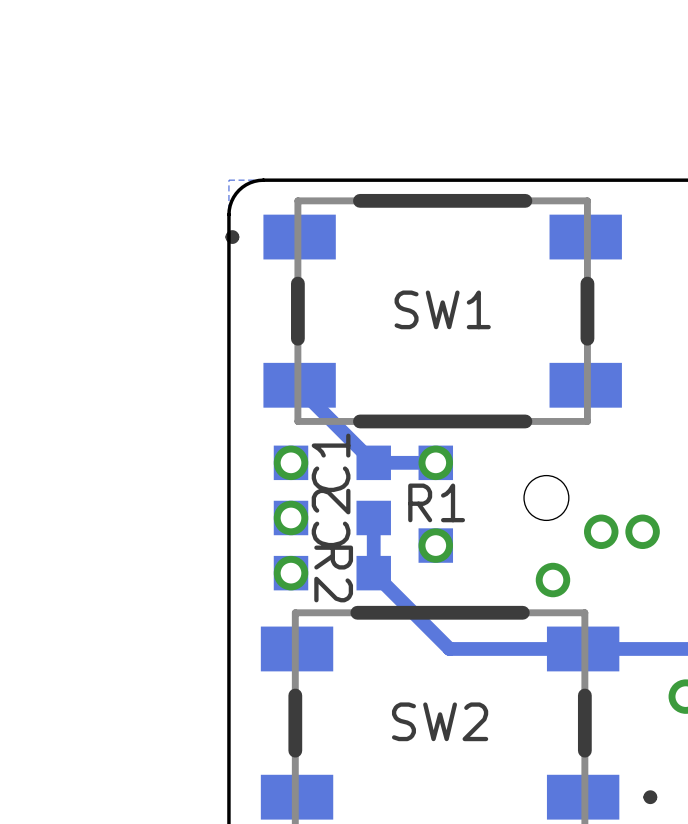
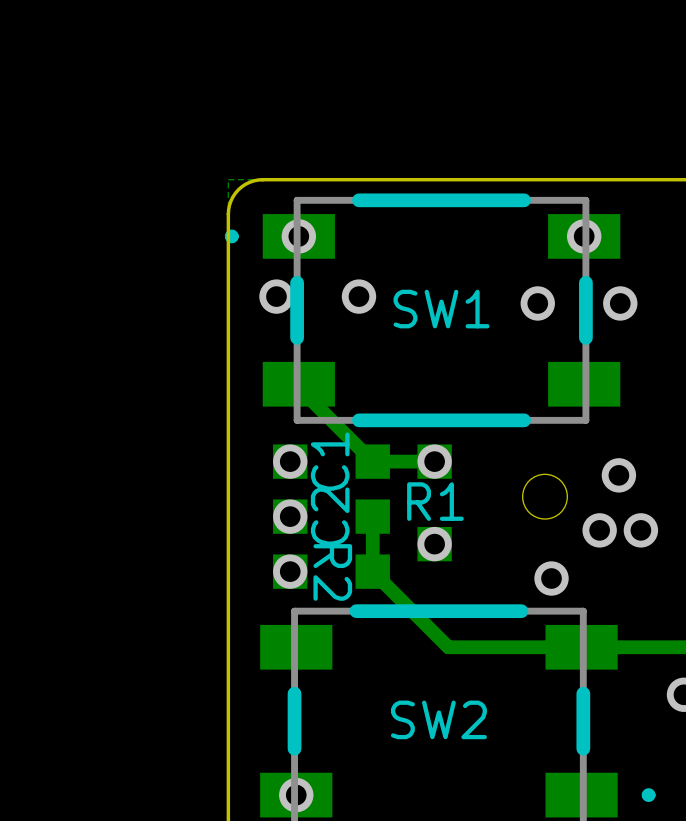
via: none -> (298, 236)
via: none -> (584, 236)
via: none -> (276, 296)
via: none -> (358, 296)
via: none -> (537, 303)
via: none -> (620, 303)
via: none -> (618, 475)
via: none -> (296, 795)

